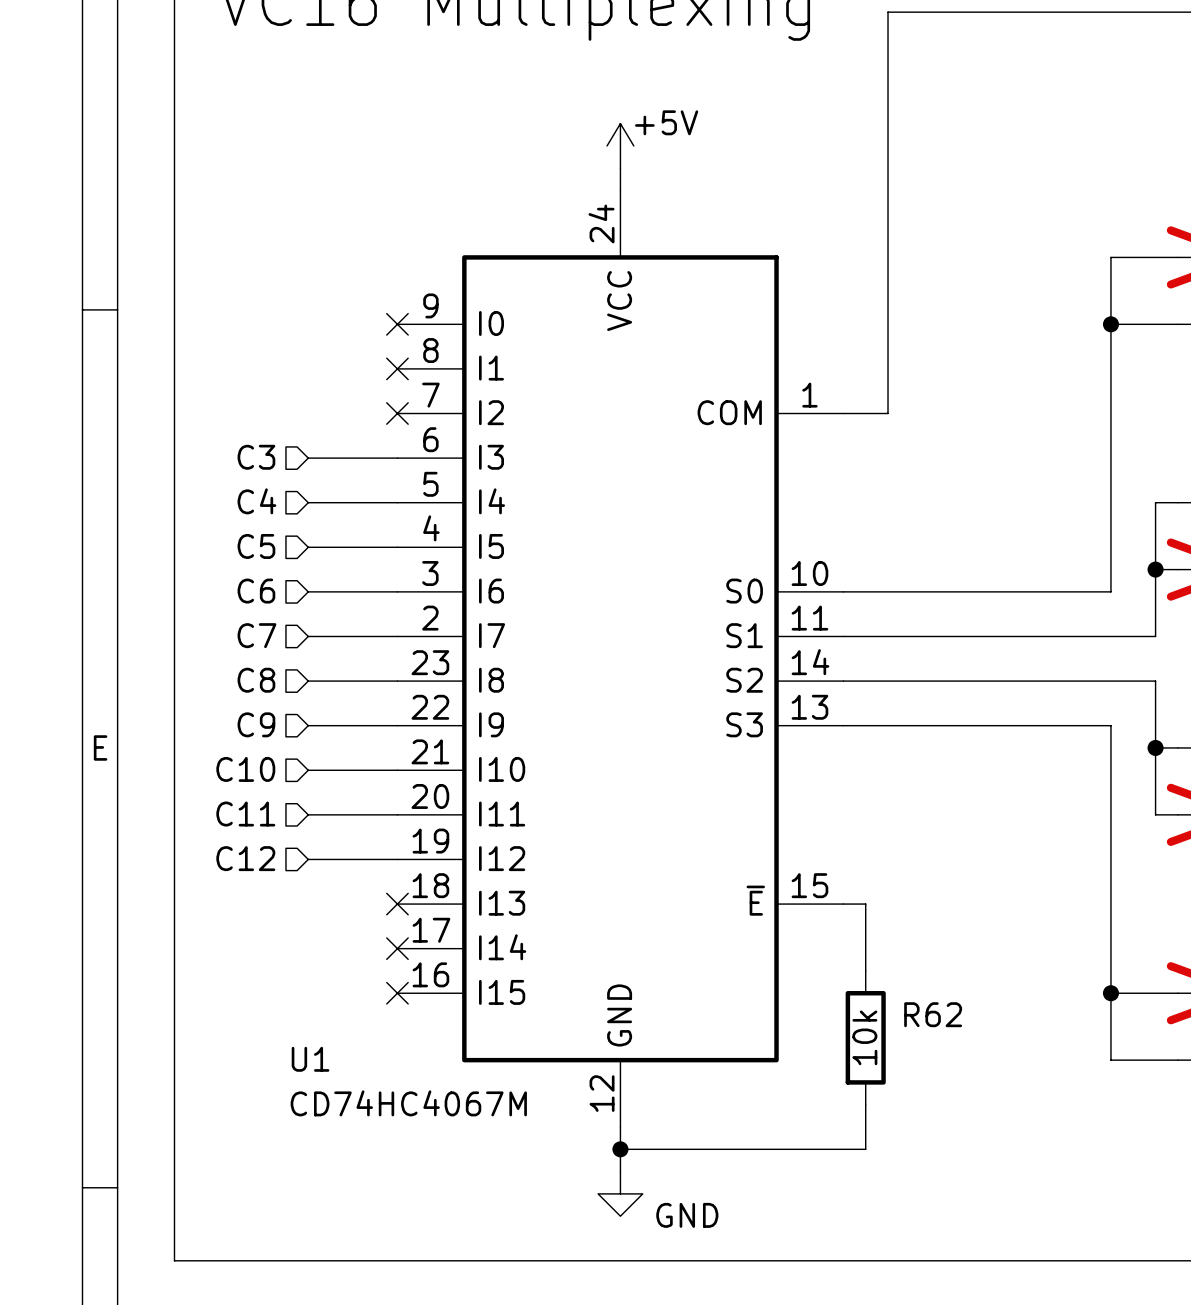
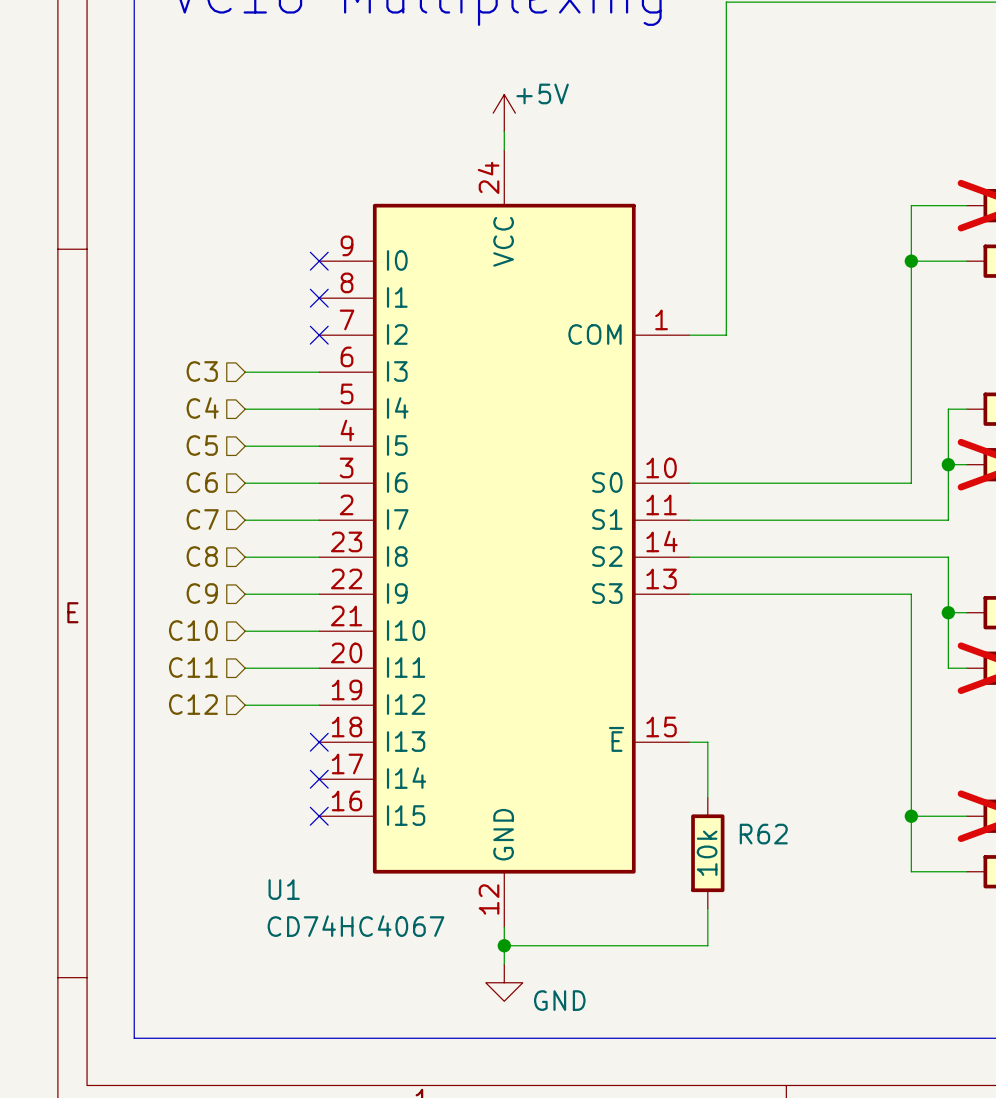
U1 name position: U1 (310, 1059) -> U1 (284, 889)
U1 value: CD74HC4067M (408, 1103) -> CD74HC4067 (355, 926)

